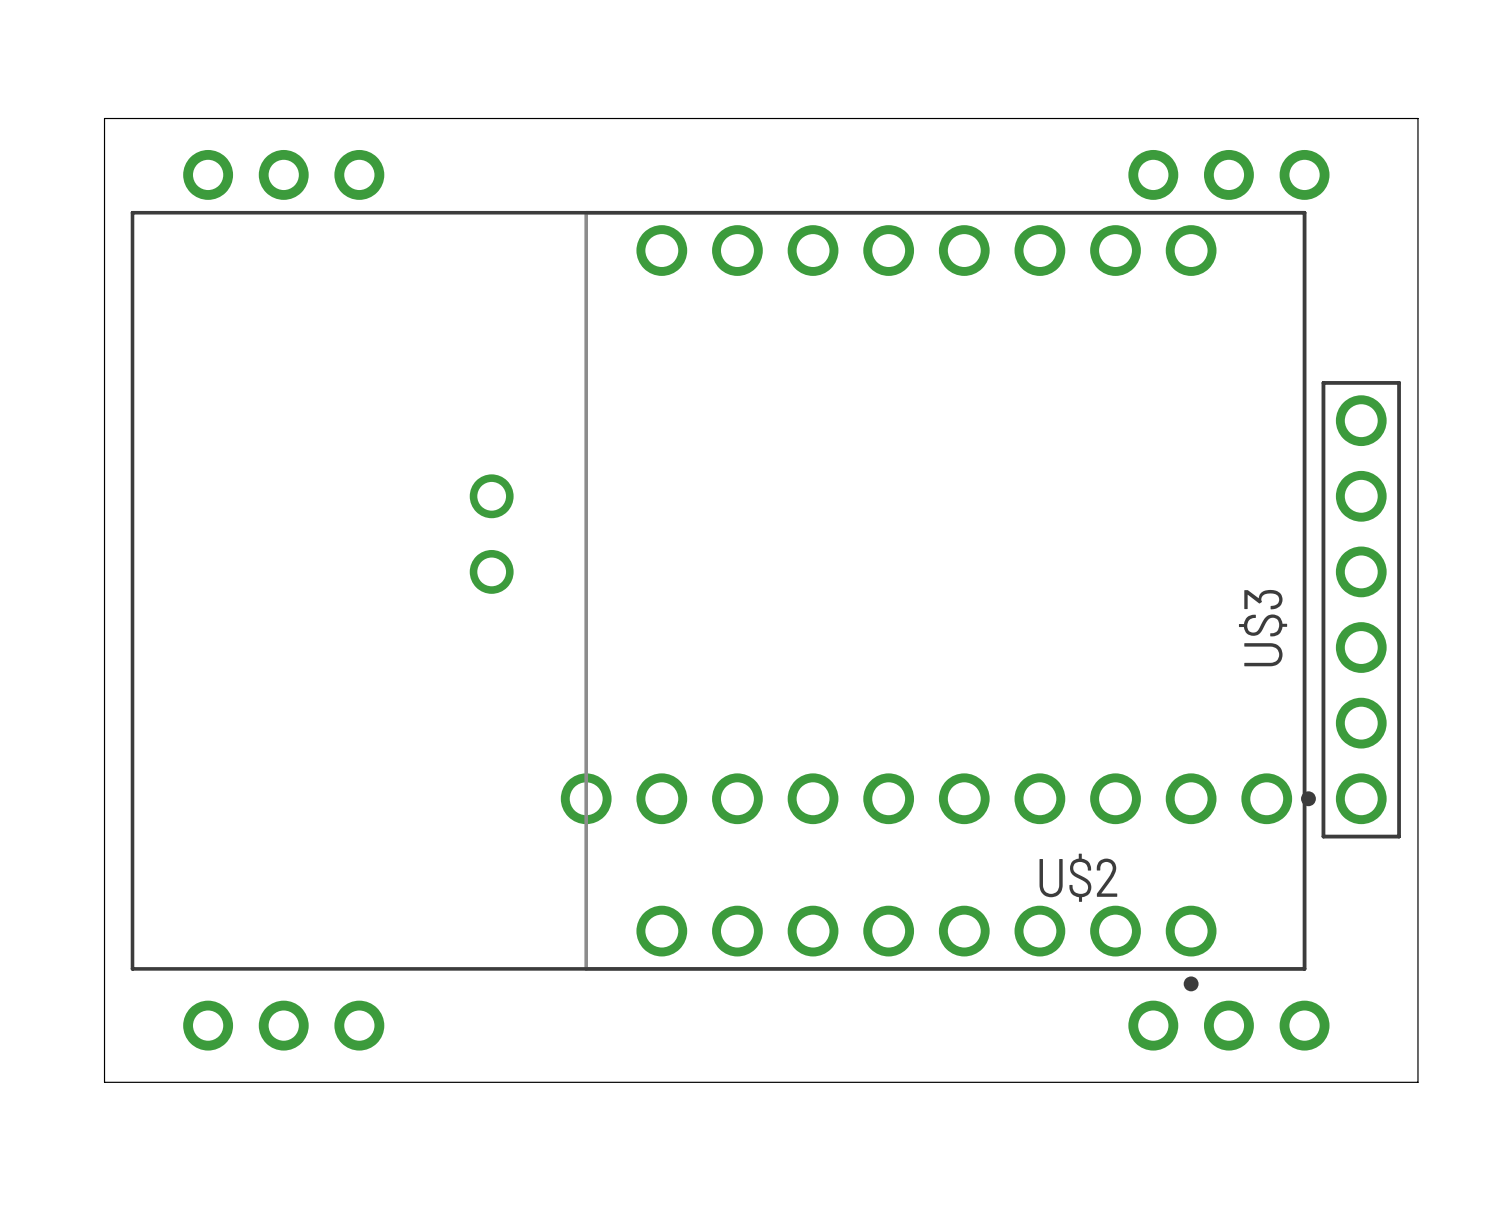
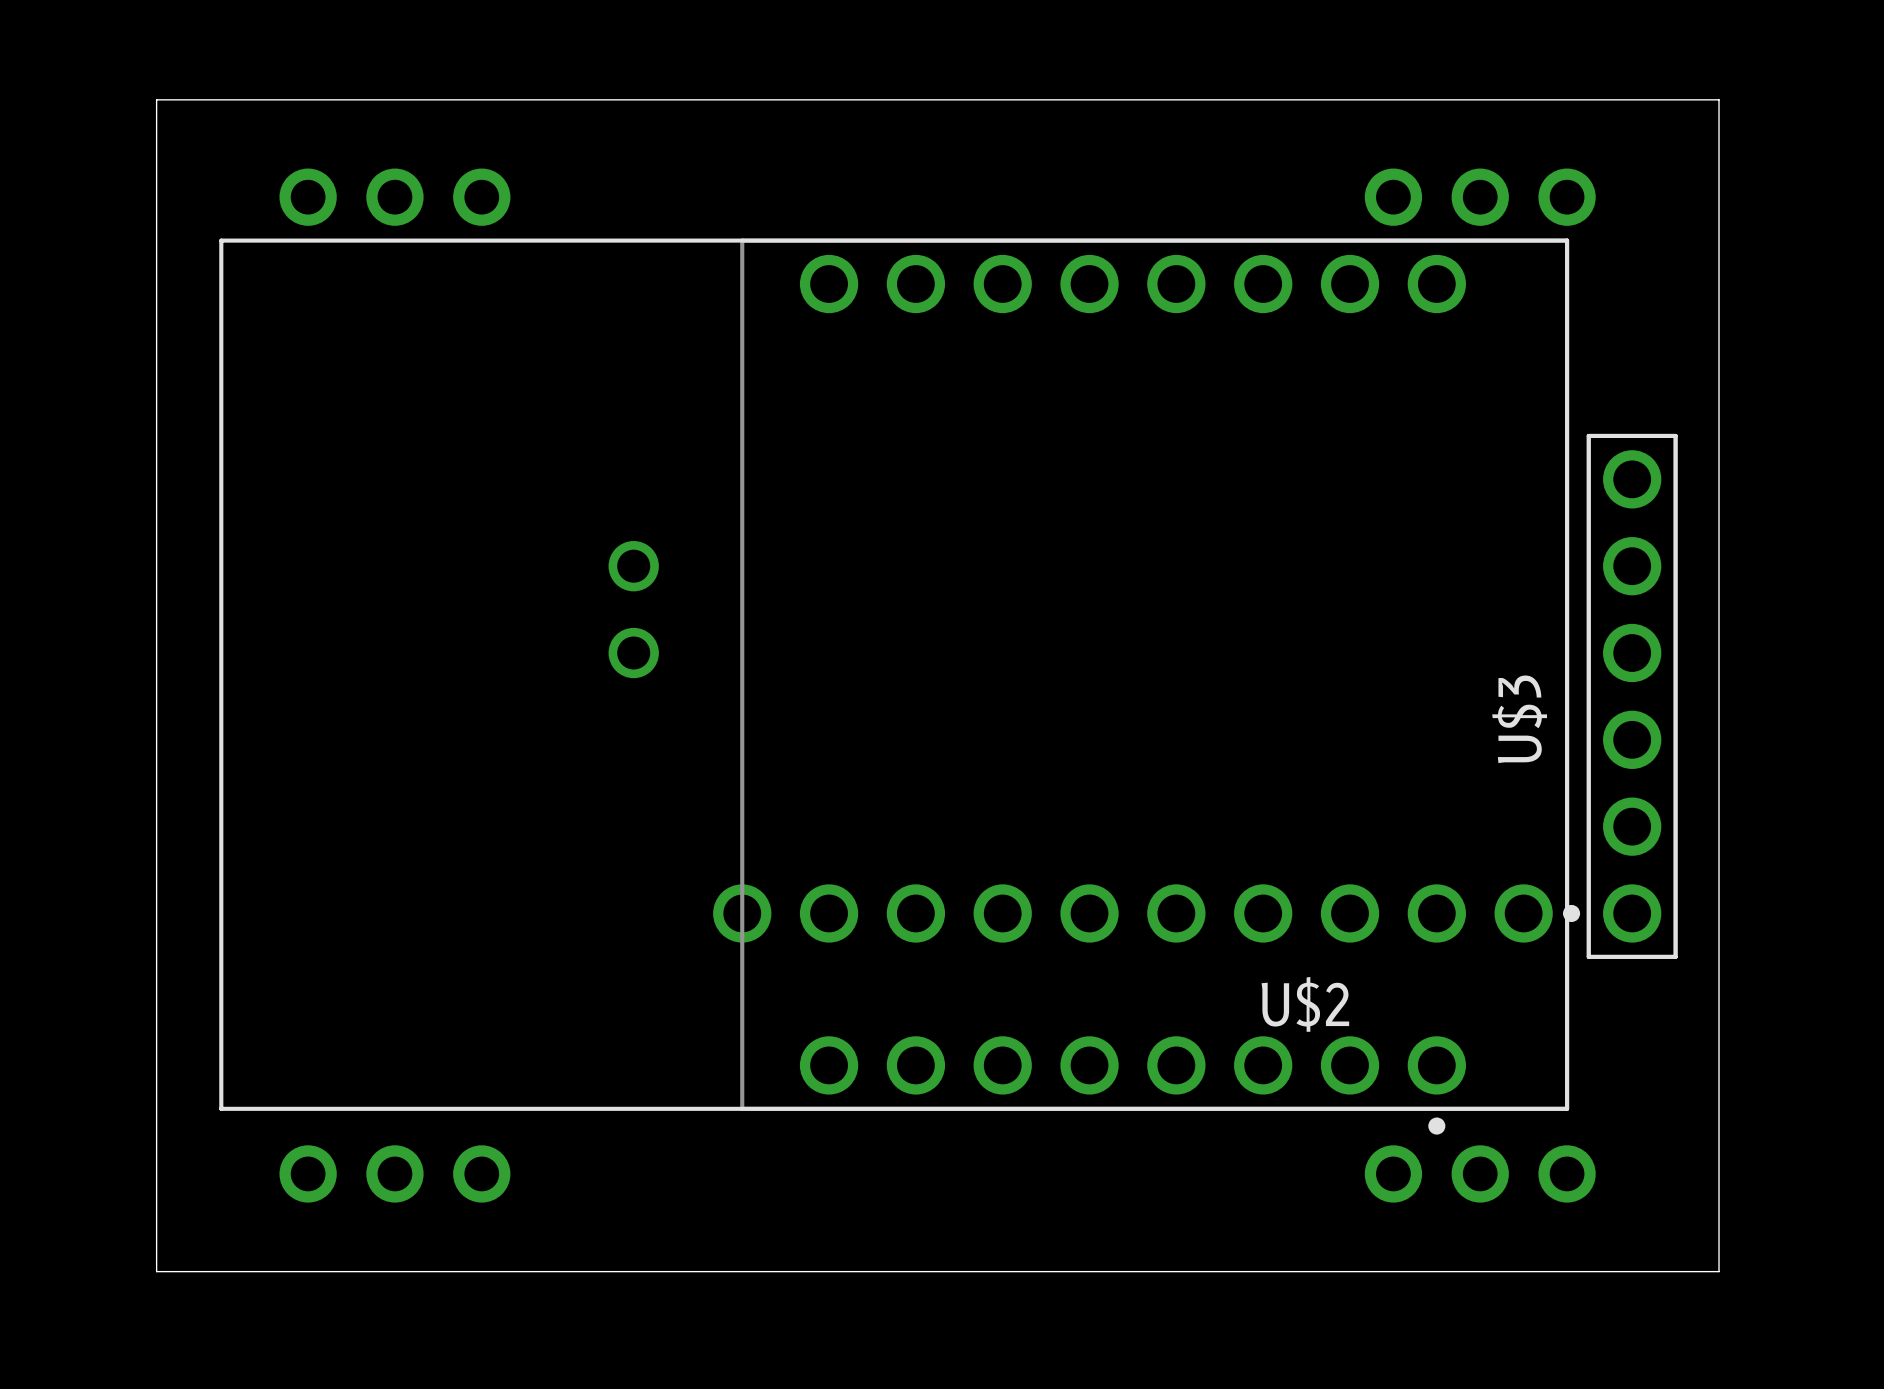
board edge: (1417, 118) (104, 118) (104, 1082) (1417, 1082) (1417, 118) -> (1719, 99) (1719, 1271) (156, 1271) (156, 99) (1719, 99)

